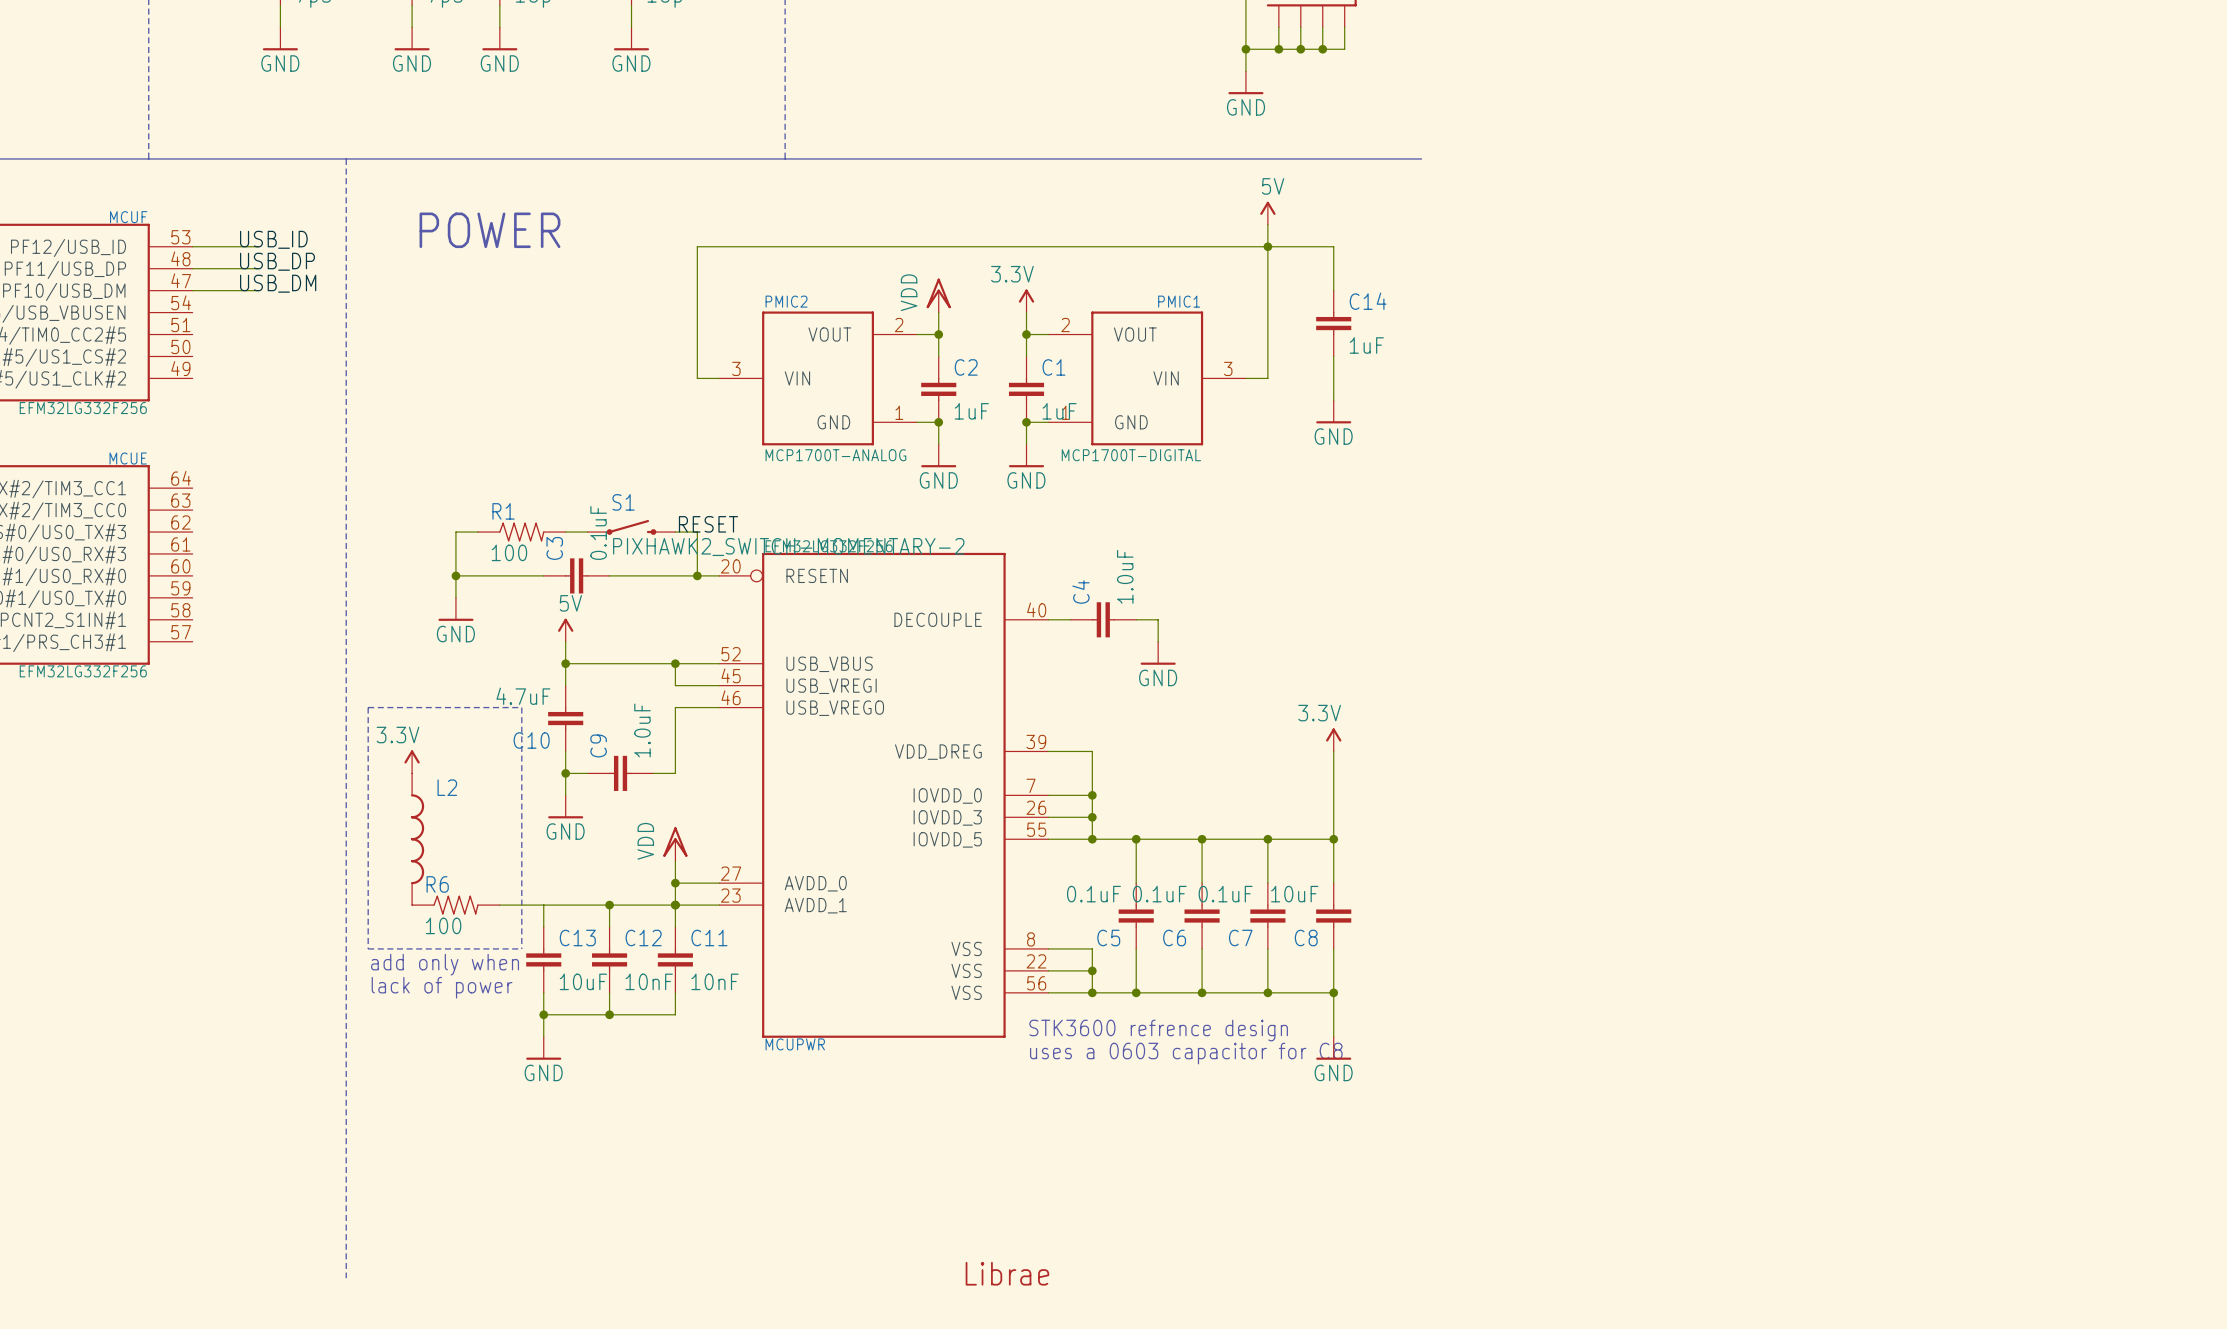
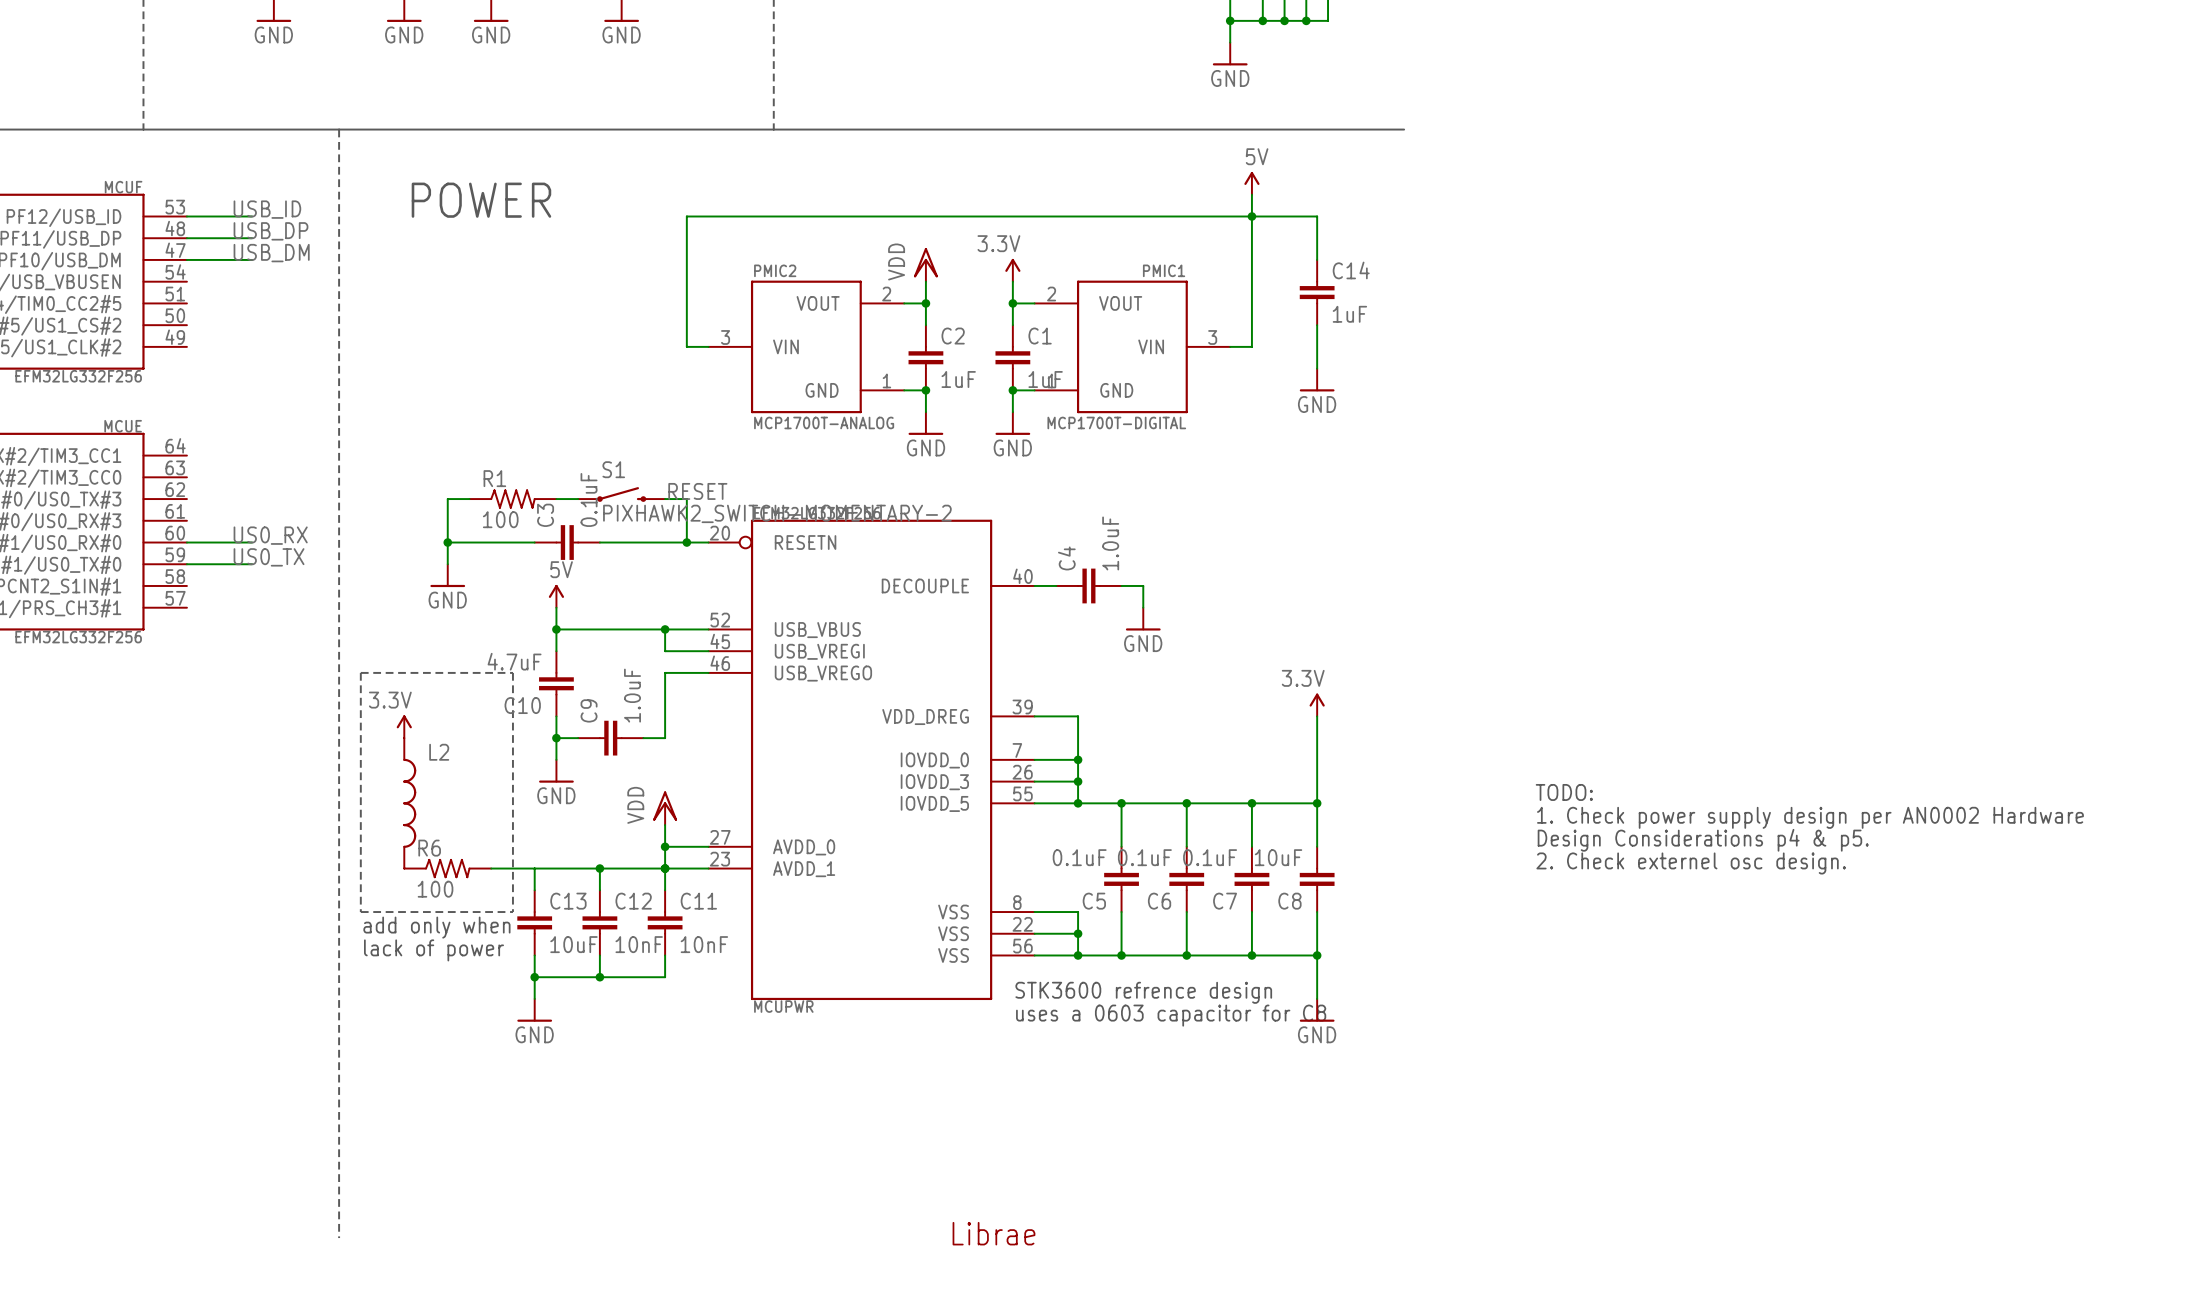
label: none -> US0_RX (270, 535)
wire: none -> (186, 542) (252, 542)
label: none -> US0_TX (269, 557)
wire: none -> (186, 564) (252, 564)
text: none -> TODO: (1564, 792)
text: none -> 1. Check power supply design per AN0002 Hardware (1810, 817)
text: none -> Design Considerations p4 & p5. (1703, 840)
text: none -> 2. Check externel osc design. (1691, 863)

